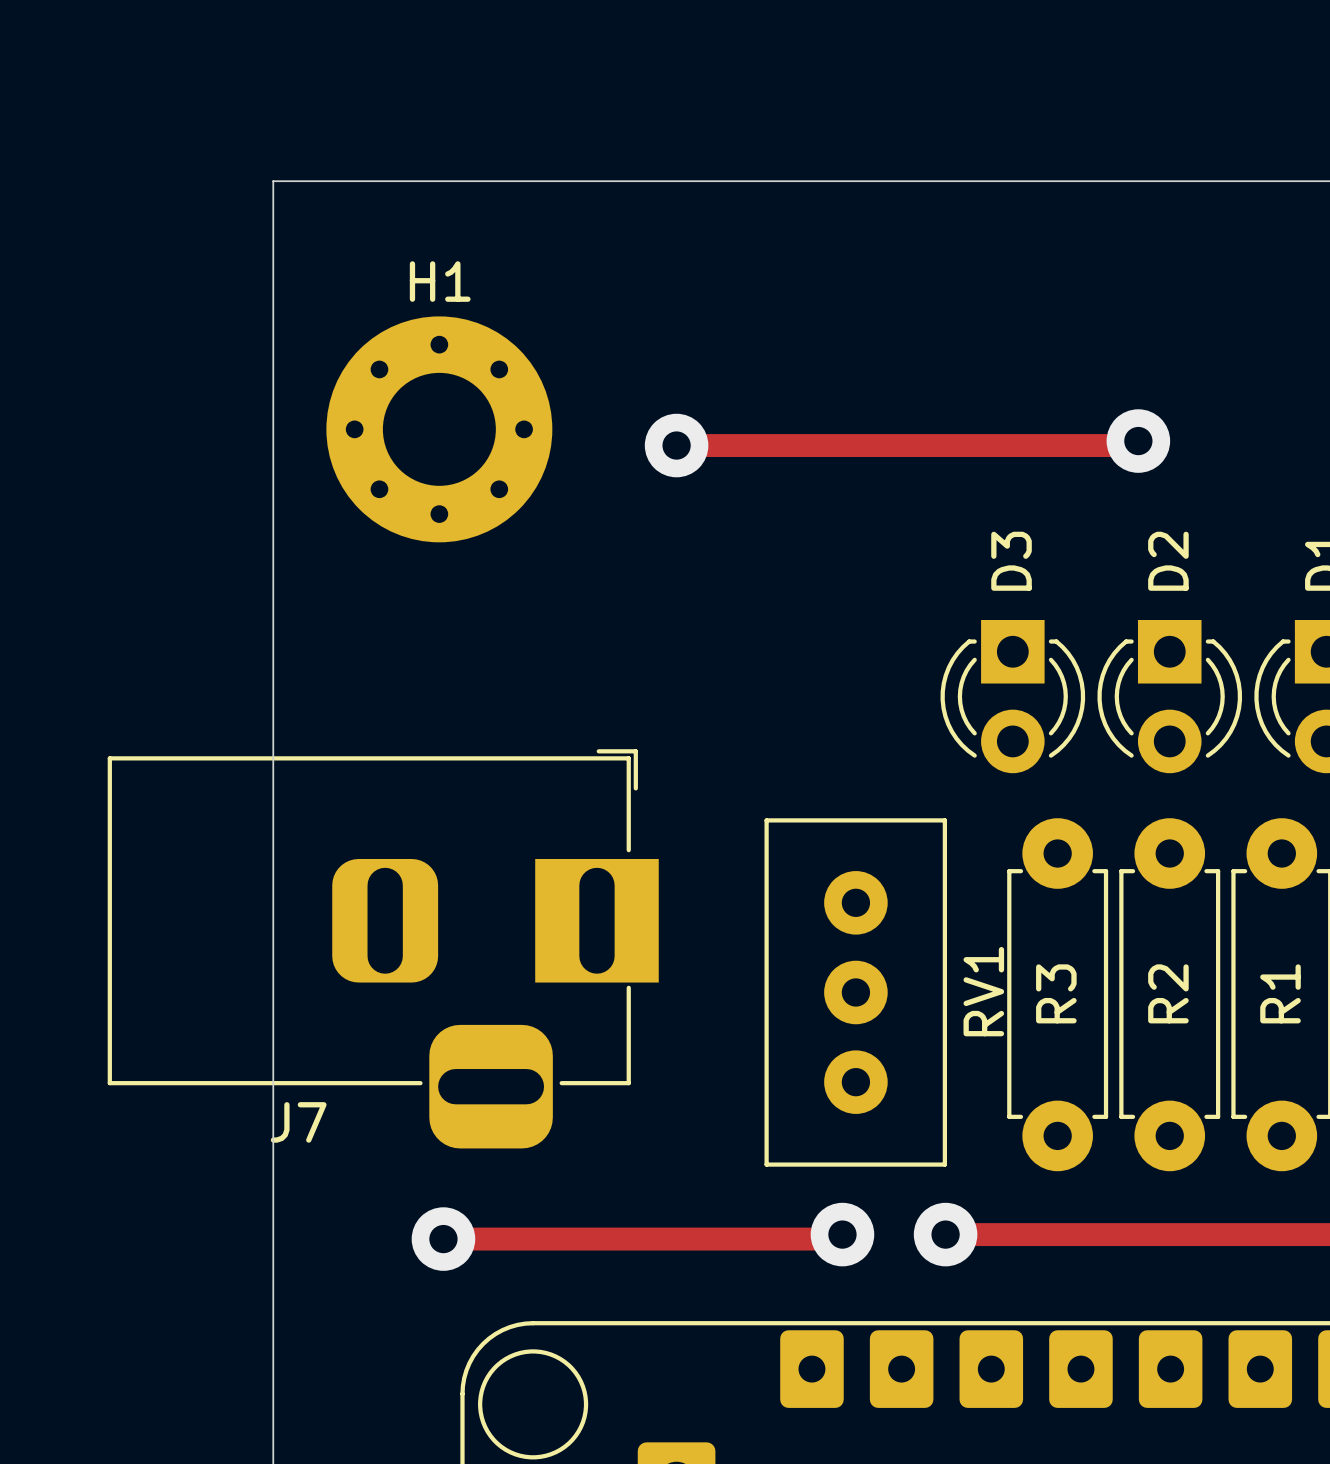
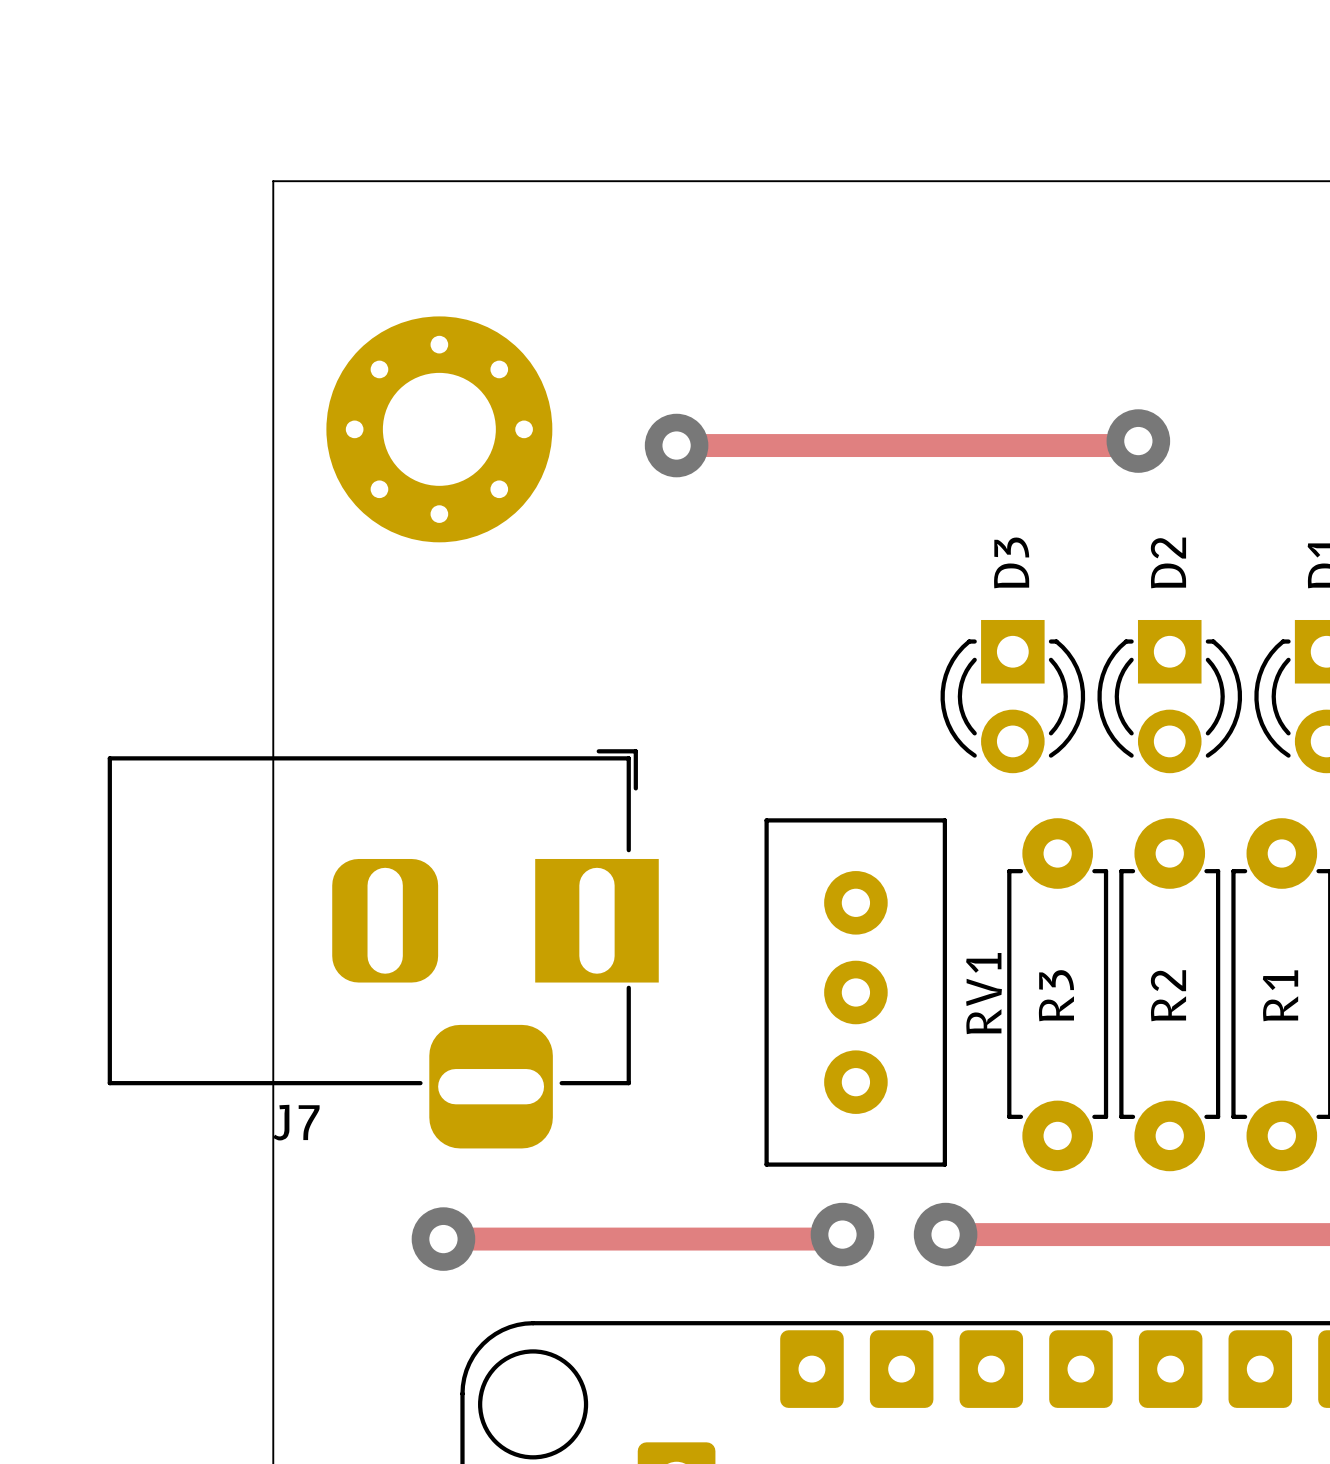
H1 name: H1 (440, 281) -> none

